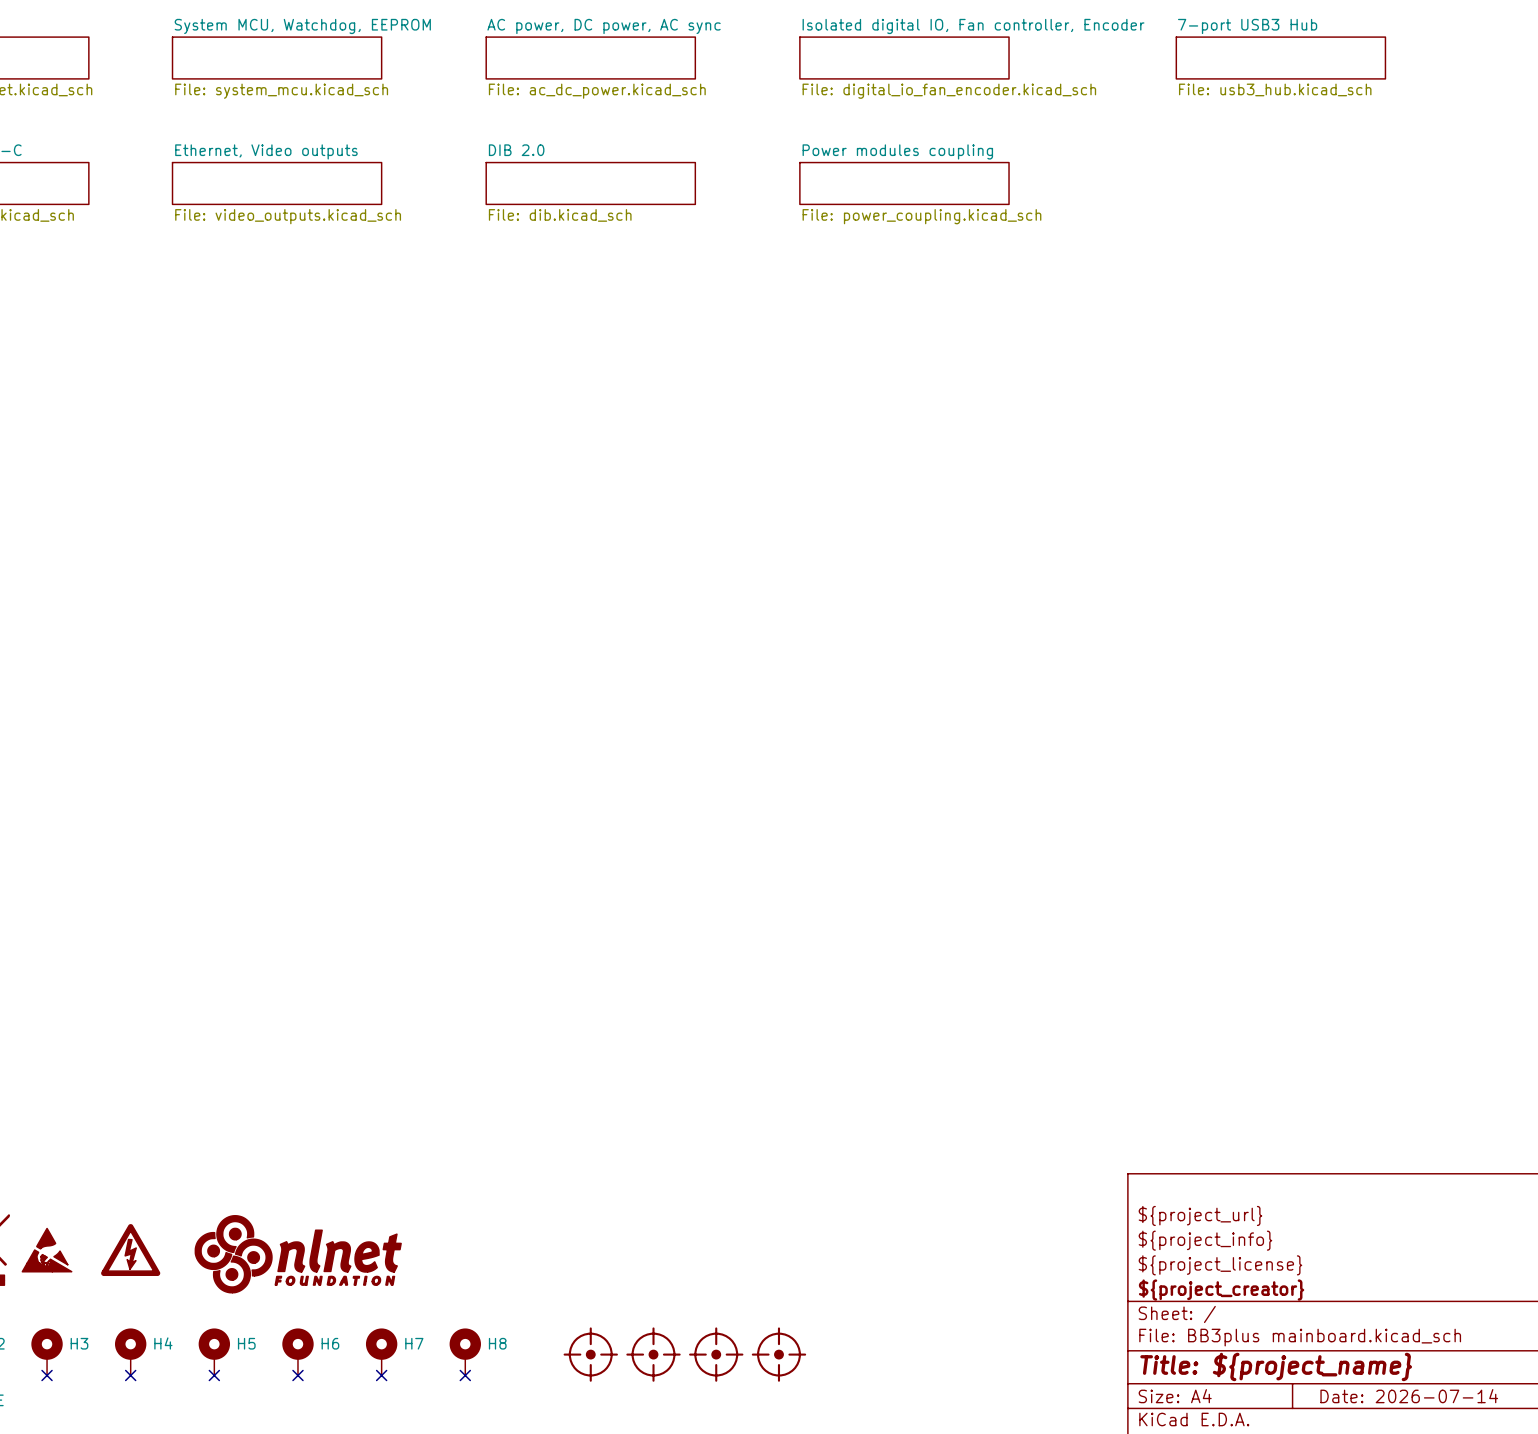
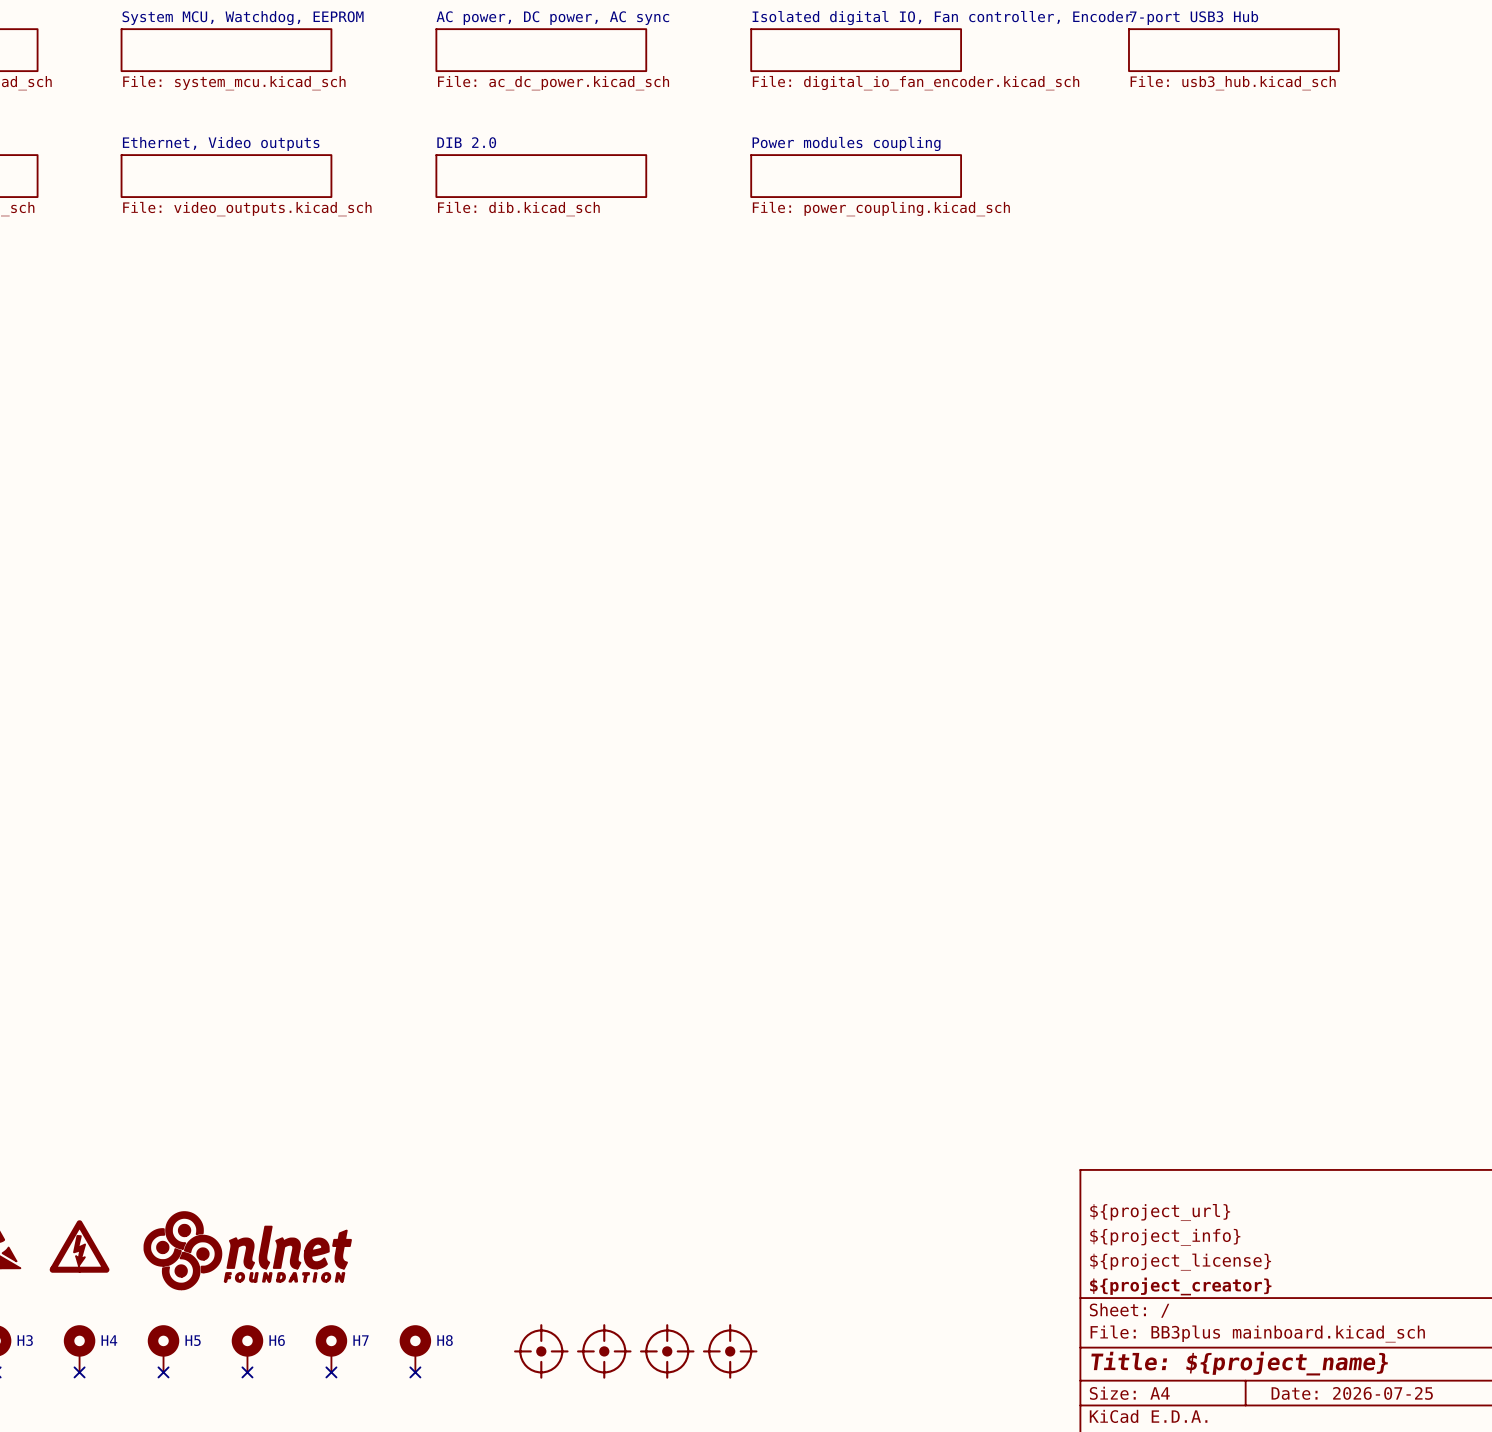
title block: Date: 2026-07-14 (1409, 1396) -> Date: 2026-07-25 (1352, 1393)

